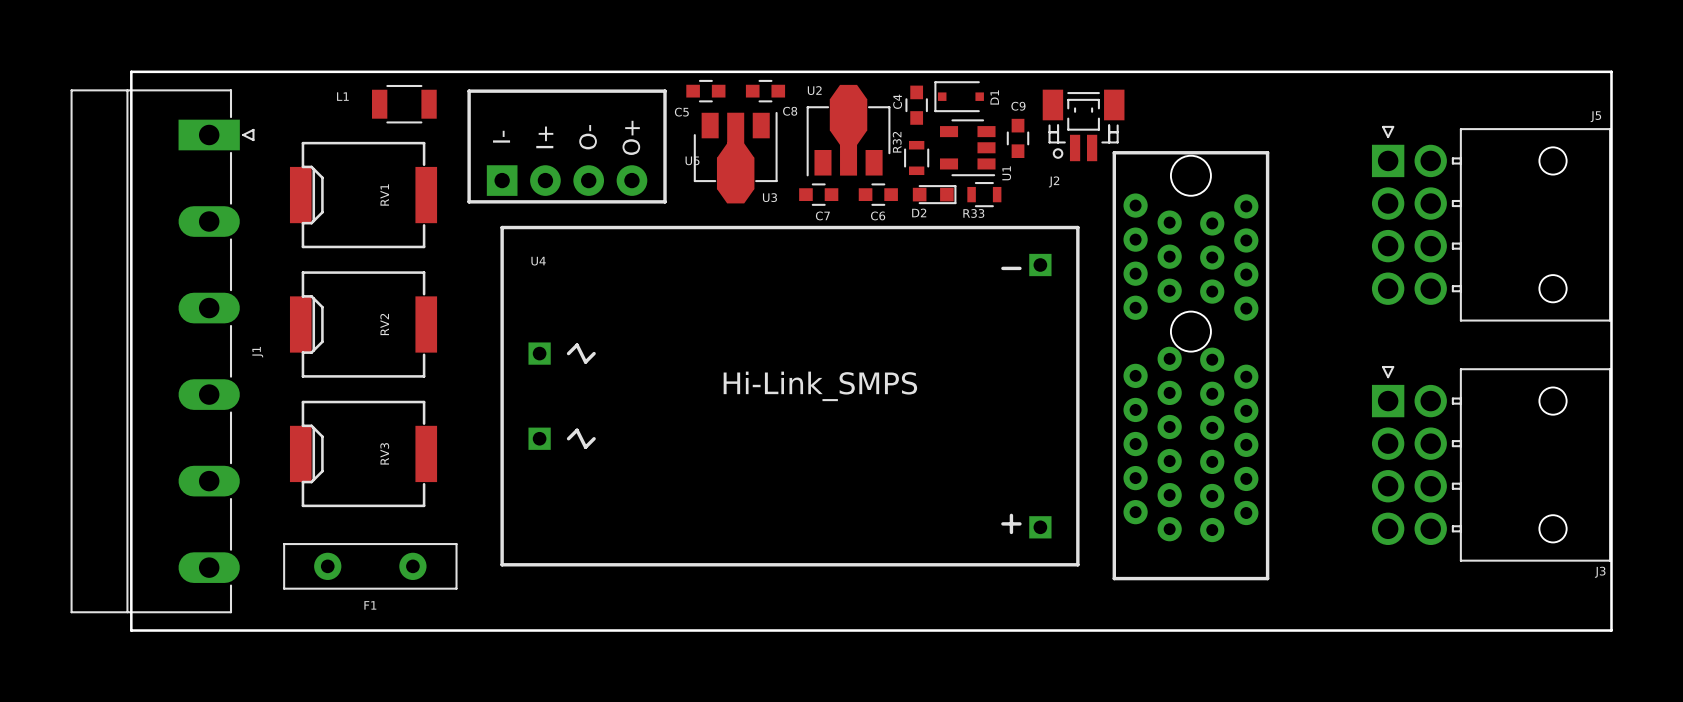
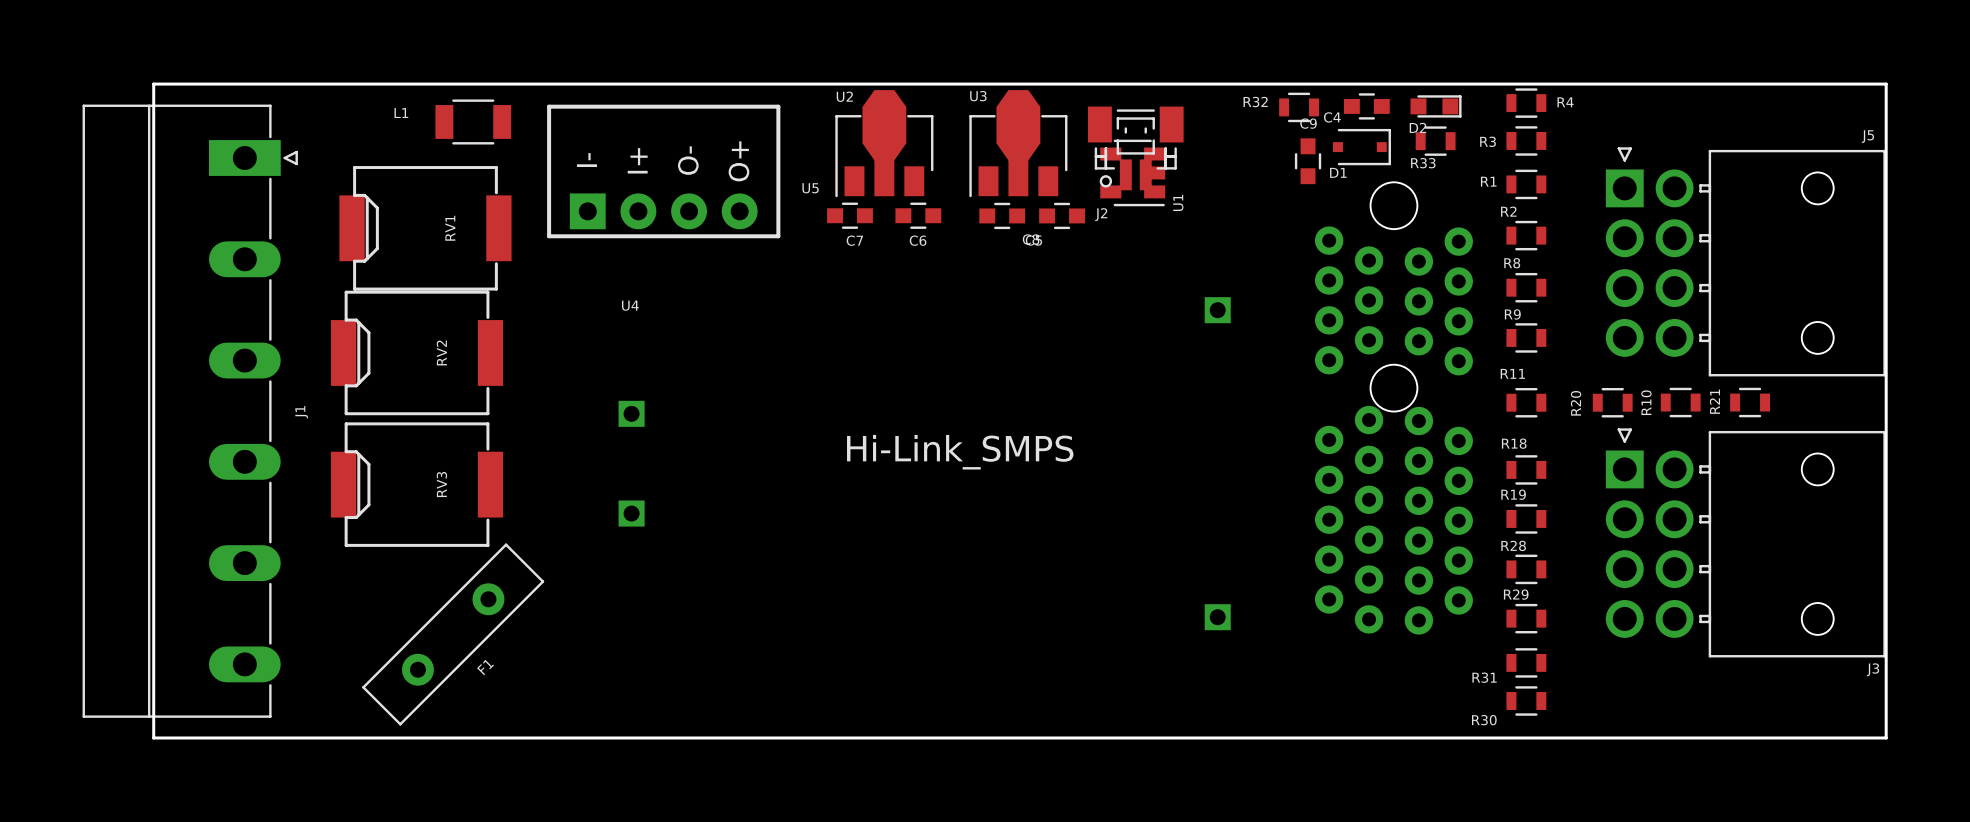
R4: none -> (1526, 103)
C5 position: (705, 91) -> (1062, 215)
C8 position: (765, 91) -> (1002, 215)
D1 rotation: 0° (959, 96) -> 180° (1361, 147)
D1 position: (959, 96) -> (1361, 147)
C4 rotation: 0° (916, 105) -> 90° clockwise (1366, 106)
C4 position: (916, 105) -> (1366, 106)
R3: none -> (1526, 140)
J2 position: (1083, 125) -> (1135, 148)
U2 position: (848, 130) -> (884, 143)
C9 position: (1018, 138) -> (1308, 161)
part footprint: [1112, 151, 1270, 581] -> [1314, 182, 1473, 635]
U3 rotation: 0° (735, 157) -> 180° (1018, 143)
U3 position: (735, 157) -> (1018, 143)
R1: none -> (1526, 184)
R32 rotation: 0° (916, 158) -> 90° clockwise (1299, 107)
R32 position: (916, 158) -> (1299, 107)
C7 position: (818, 194) -> (849, 215)
C6 position: (878, 194) -> (918, 215)
D2 position: (934, 194) -> (1436, 106)
R33 position: (984, 194) -> (1435, 141)
R2: none -> (1526, 235)
U4 footprint: [500, 225, 1080, 567] -> [618, 297, 1231, 631]
R8: none -> (1526, 287)
R9: none -> (1526, 337)
RV2 position: (363, 324) -> (417, 352)
R10: none -> (1680, 402)
R21: none -> (1750, 402)
R11: none -> (1526, 402)
R20: none -> (1612, 402)
R18: none -> (1526, 469)
R19: none -> (1526, 518)
RV3 position: (363, 453) -> (417, 484)
R28: none -> (1526, 569)
R29: none -> (1526, 618)
F1 rotation: 0° (370, 566) -> 45° counterclockwise (453, 634)
R31: none -> (1526, 662)
R30: none -> (1526, 700)

